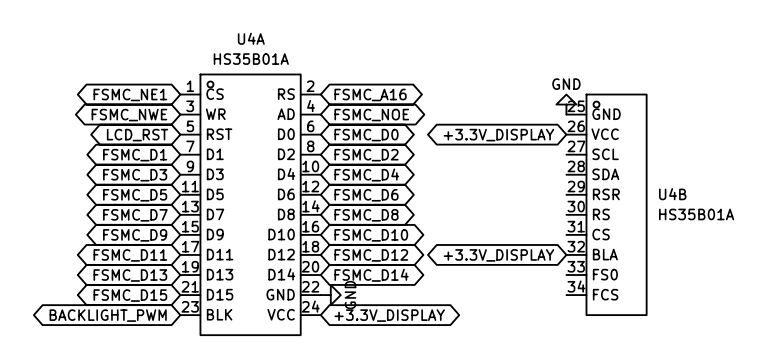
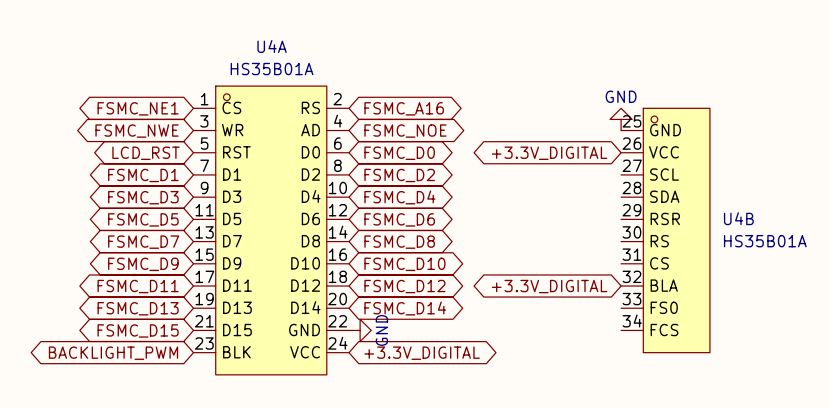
global label: +3.3V_DISPLAY (498, 135) -> +3.3V_DIGITAL (549, 153)
global label: +3.3V_DISPLAY (498, 255) -> +3.3V_DIGITAL (549, 286)
global label: +3.3V_DISPLAY (389, 315) -> +3.3V_DIGITAL (422, 353)

